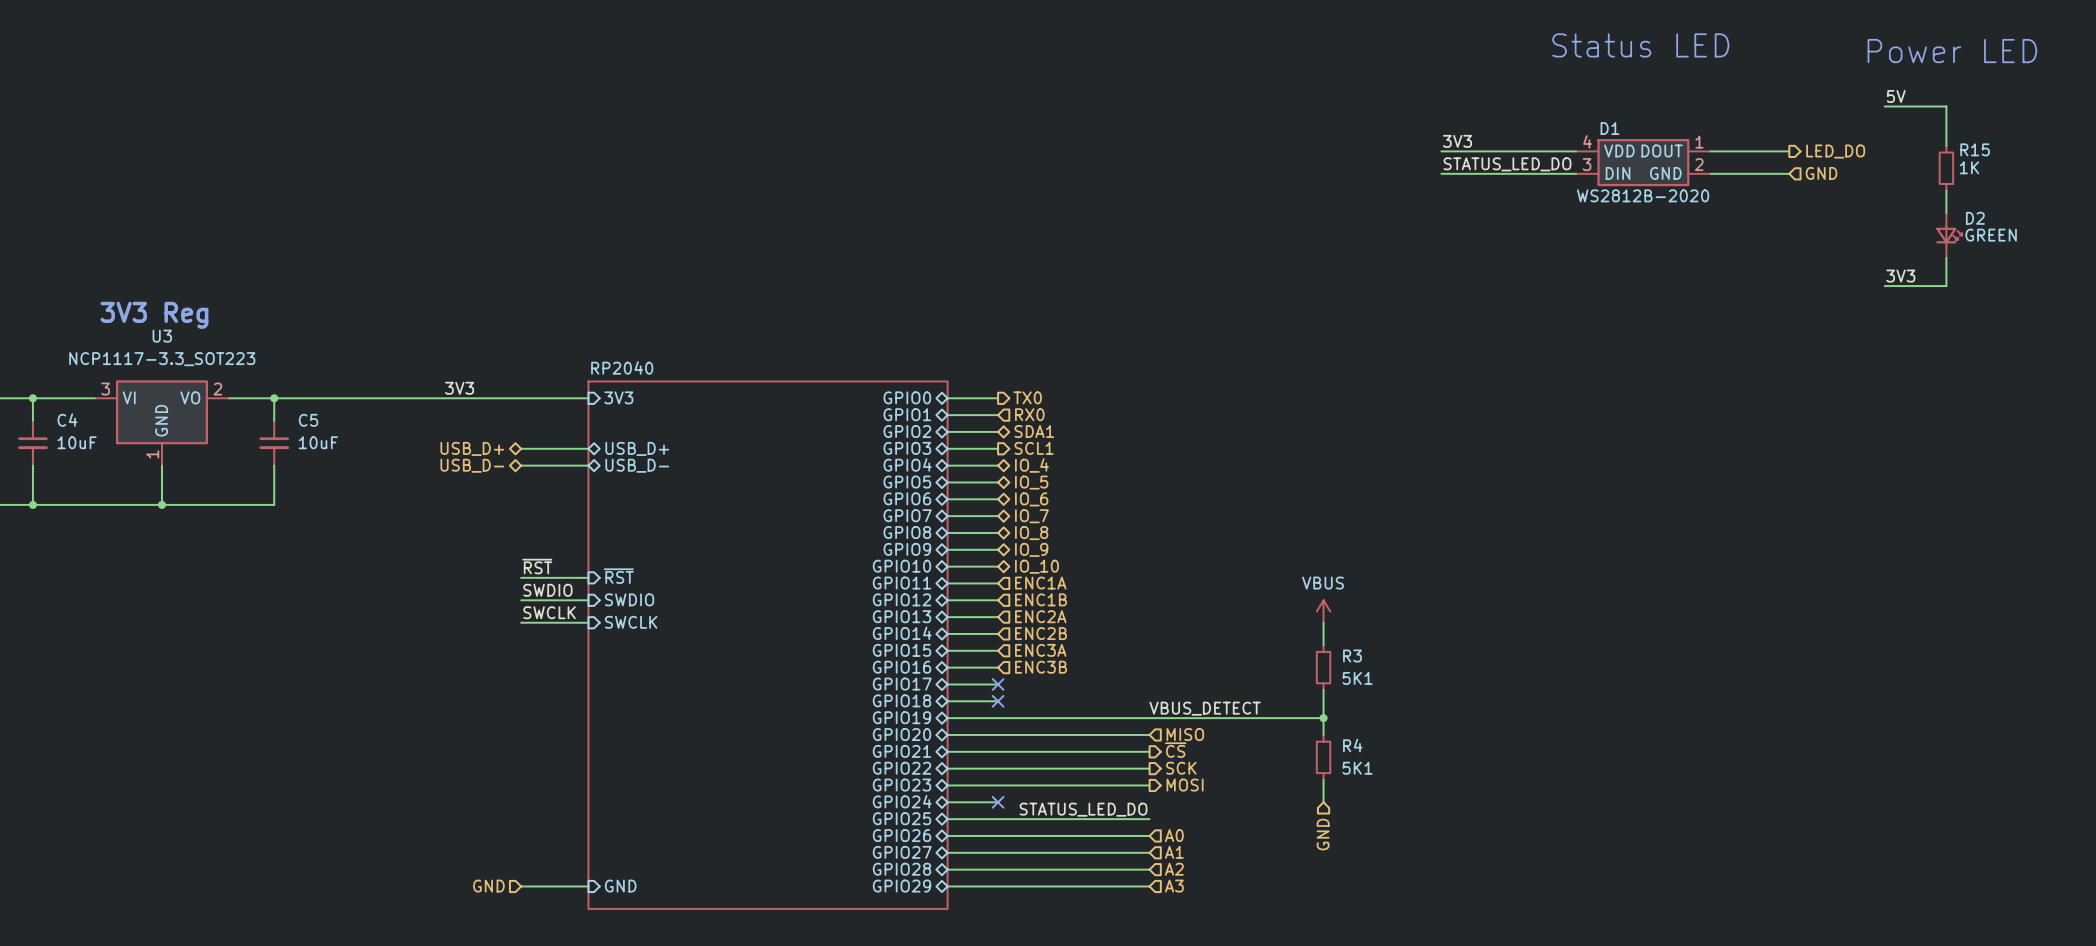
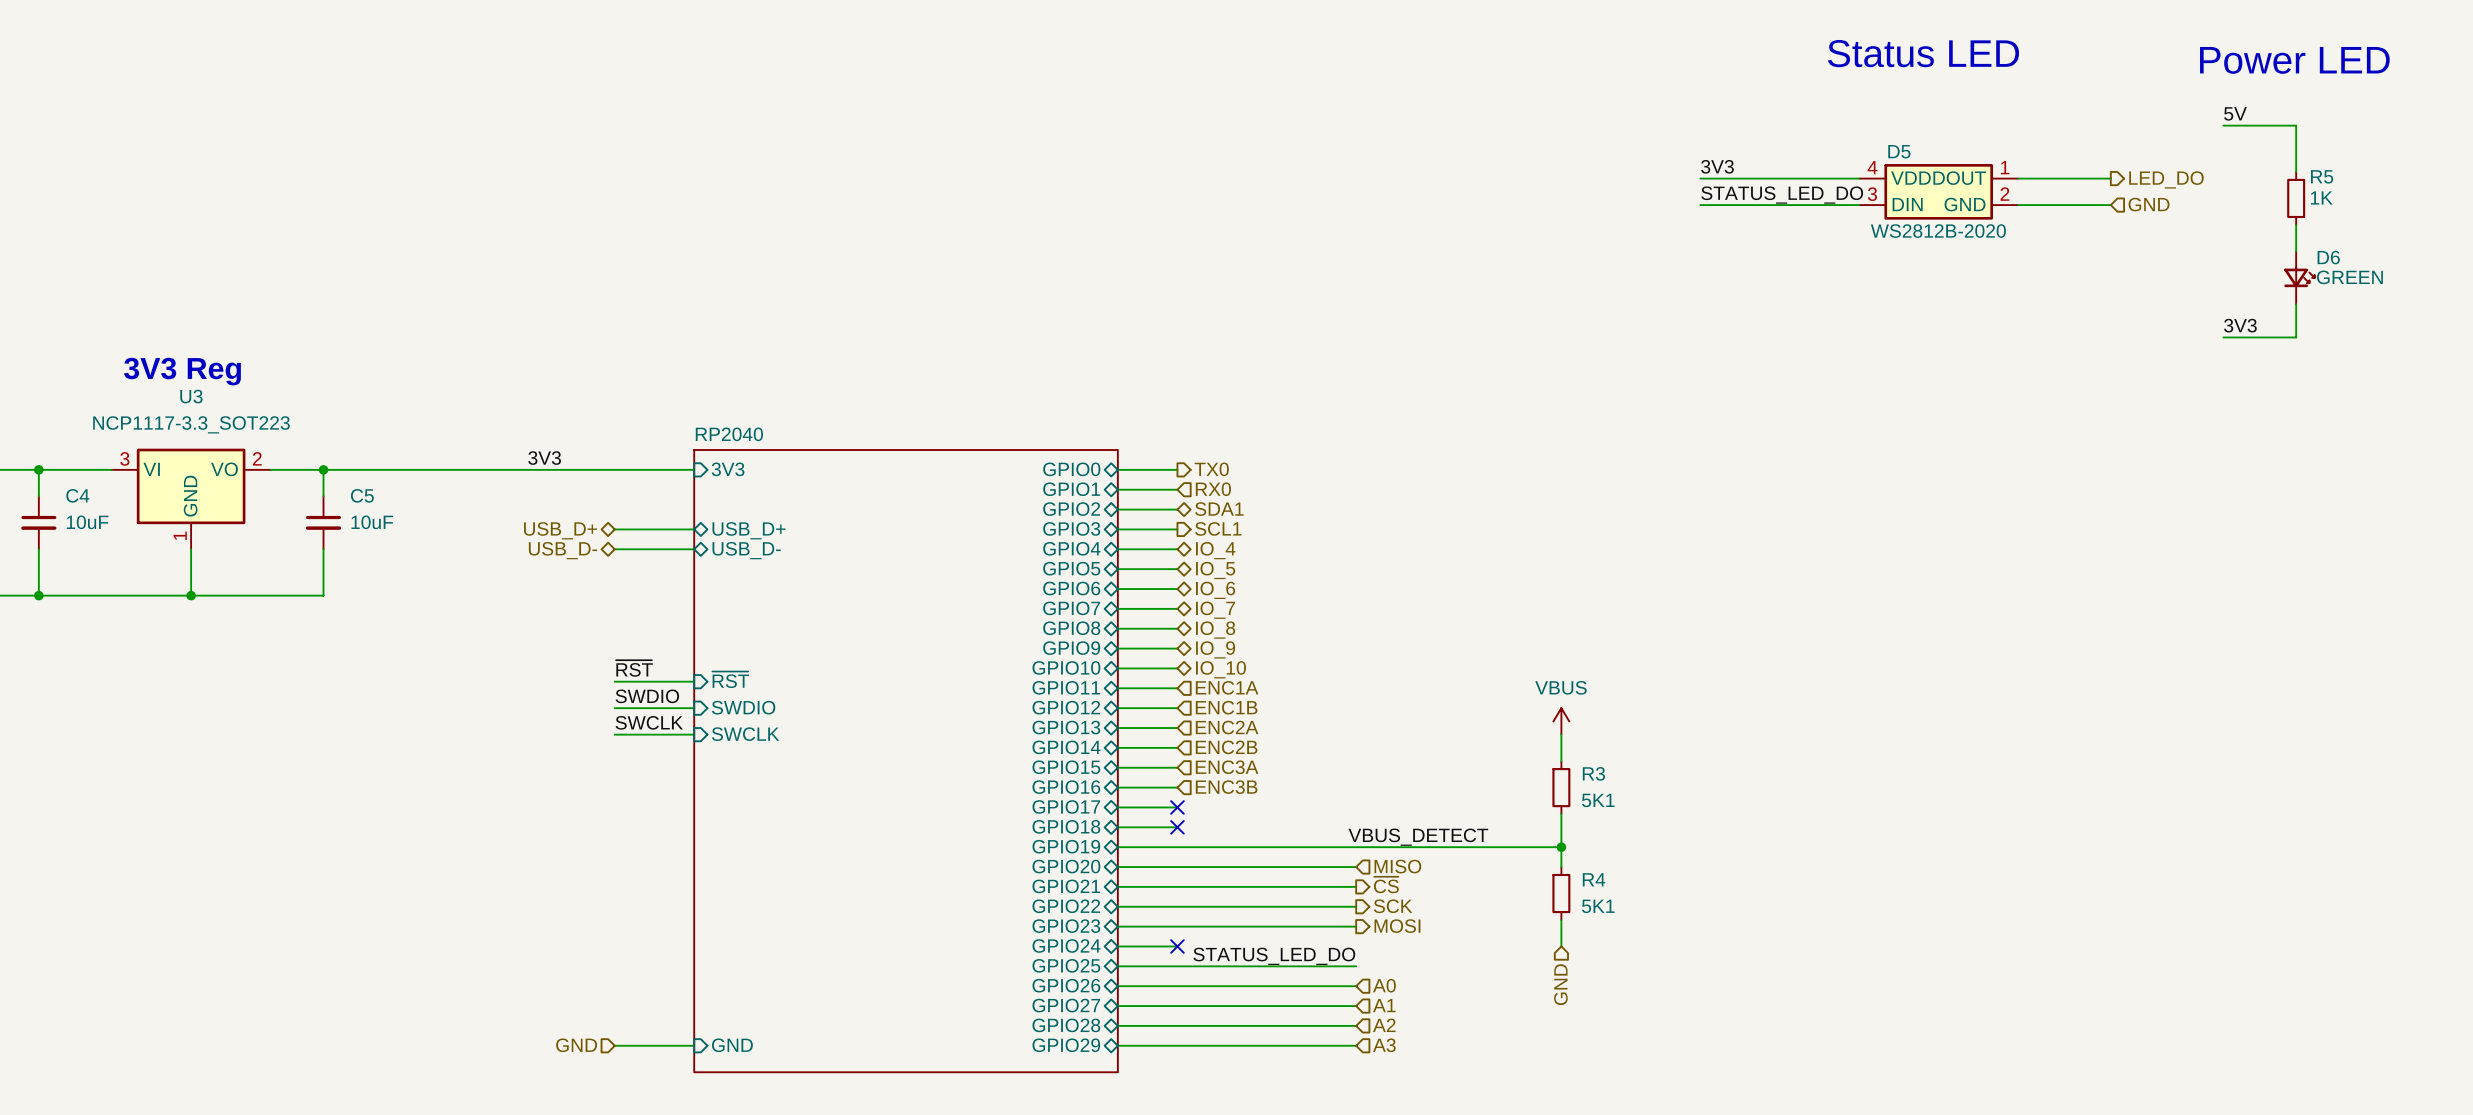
D1 name: D1 (1609, 128) -> D5 (1899, 151)
R15 name: R15 (1975, 149) -> R5 (2322, 176)
D2 name: D2 (1975, 218) -> D6 (2328, 257)

